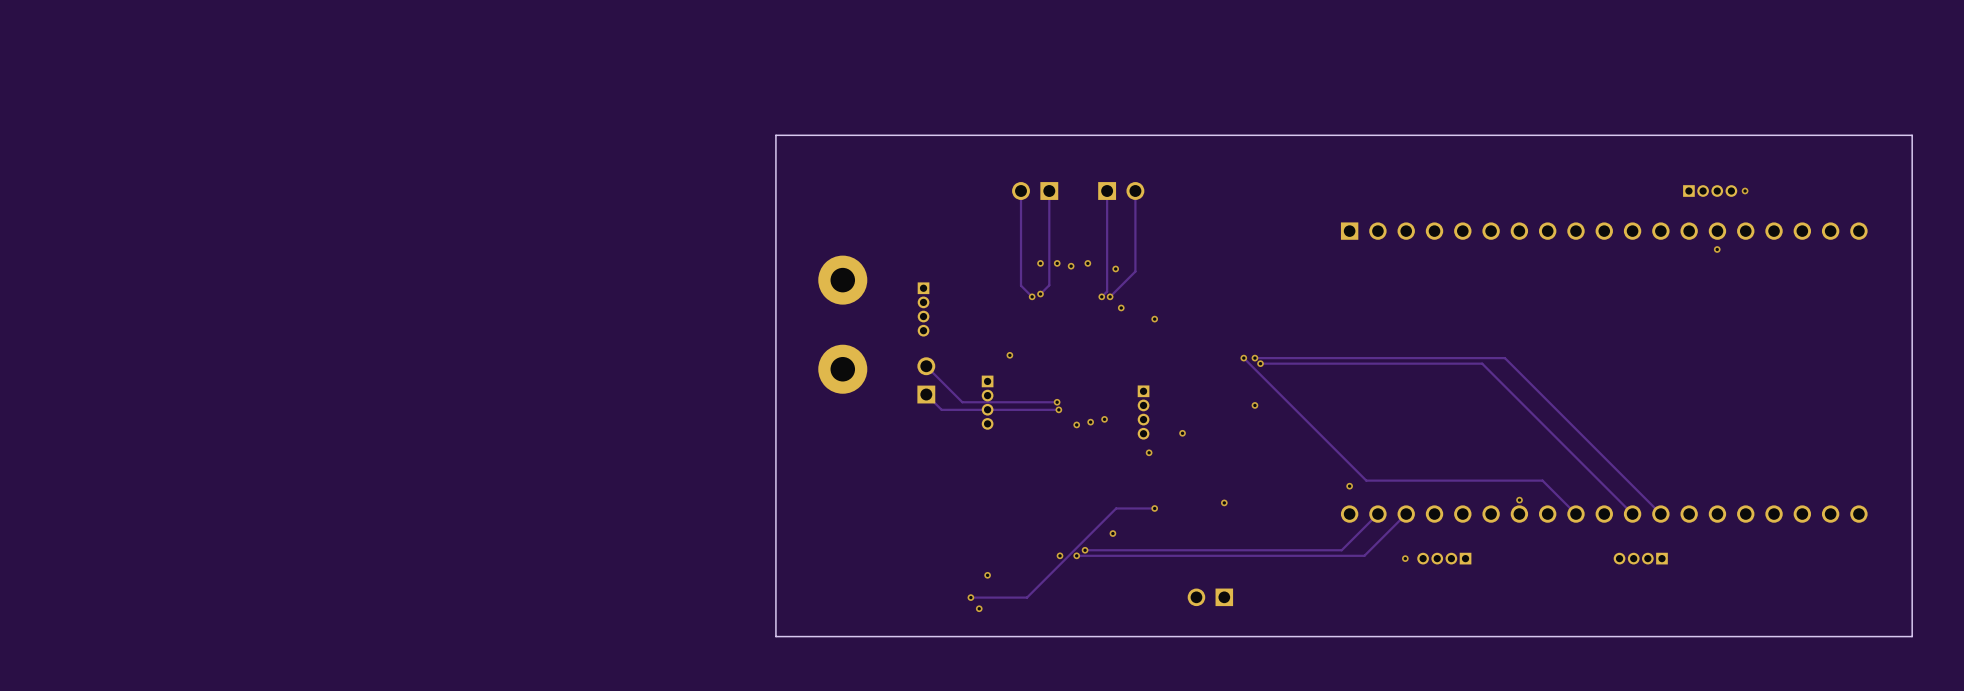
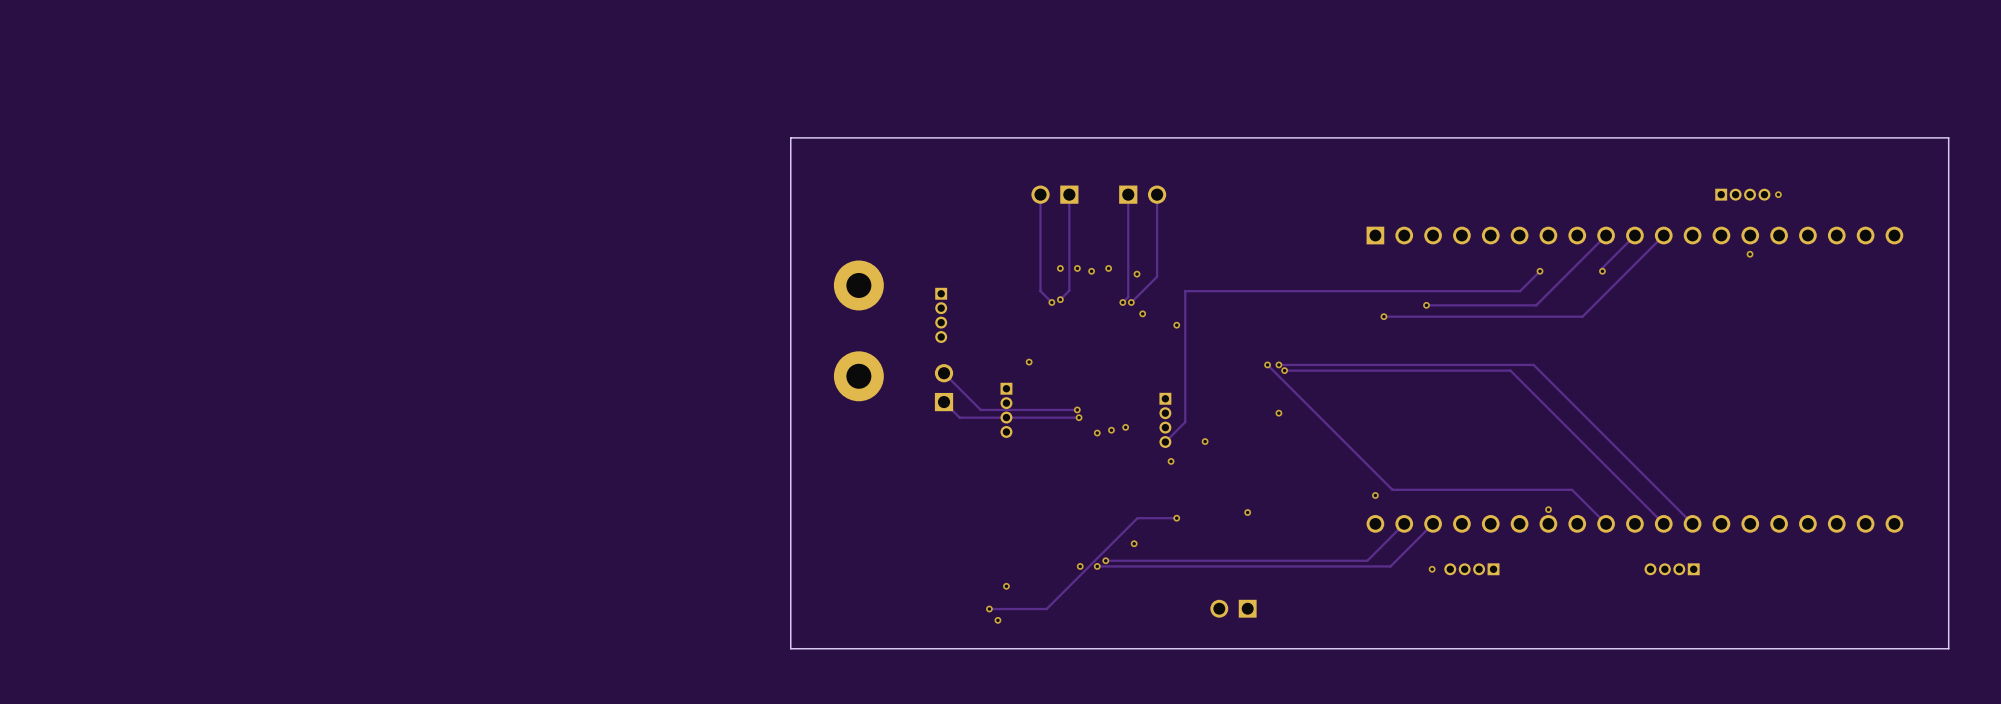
track: none -> (1606, 235) (1536, 305) (1426, 305)
track: none -> (1634, 235) (1602, 267) (1602, 271)
track: none -> (1663, 235) (1582, 316) (1383, 316)
track: none -> (1540, 271) (1520, 291) (1185, 291) (1185, 422) (1165, 442)
via: none -> (1540, 271)
via: none -> (1602, 271)
via: none -> (1426, 305)
via: none -> (1383, 316)

